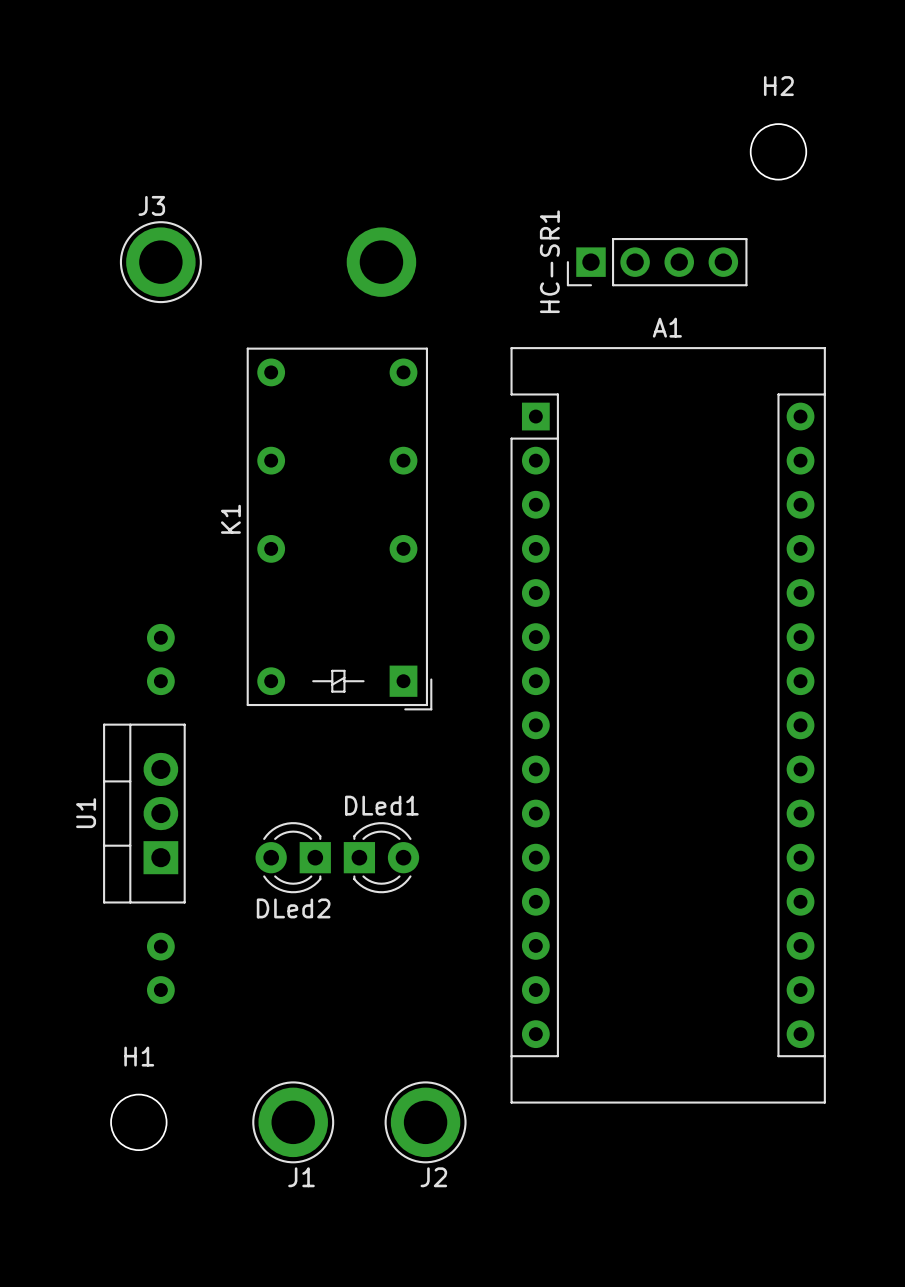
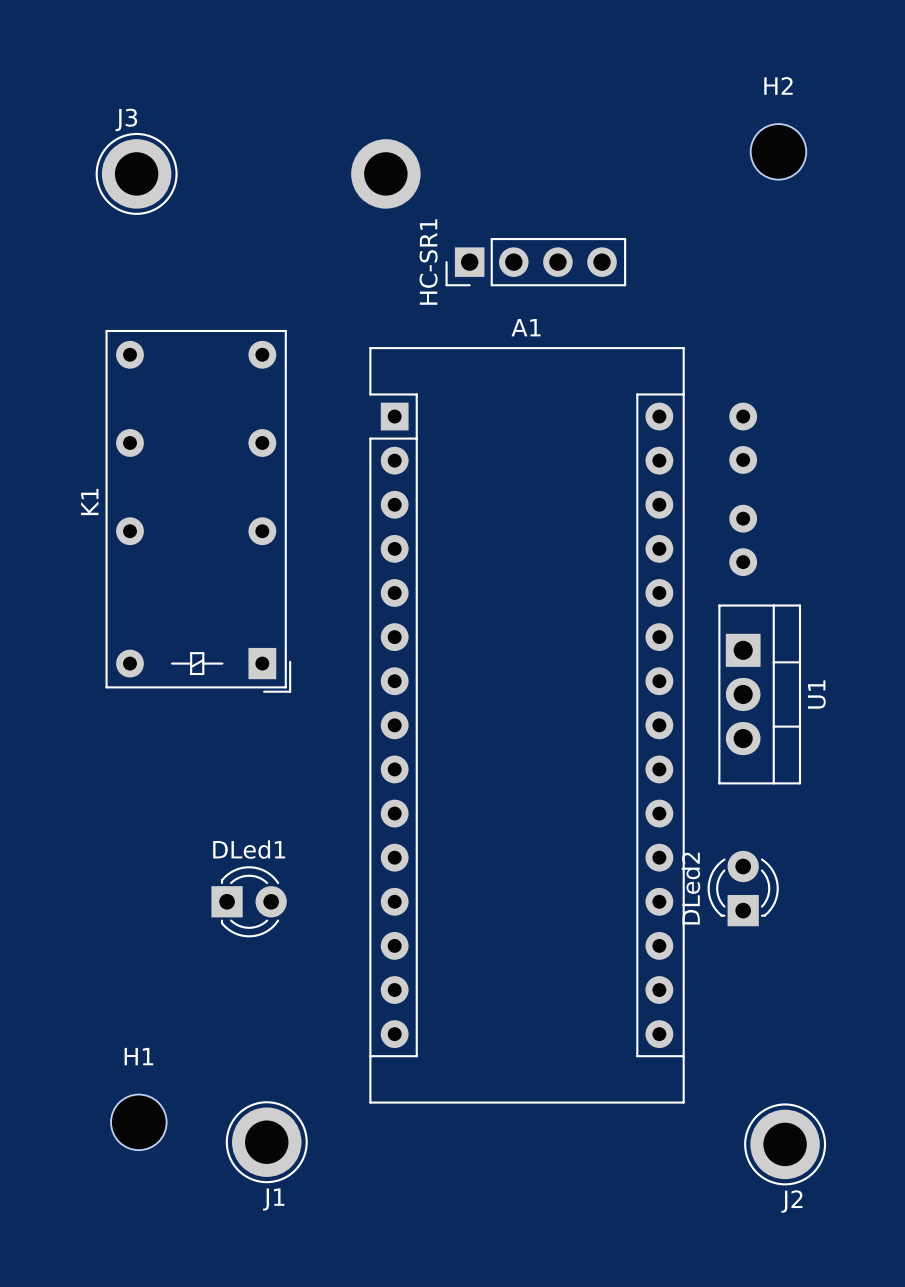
J3 position: (160, 262) -> (136, 173)
part position: (381, 262) -> (385, 173)
HC-SR1 position: (657, 262) -> (535, 262)
part: none -> (743, 438)
K1 position: (339, 528) -> (198, 511)
part: none -> (743, 540)
part: (160, 659) -> none
A1 position: (668, 725) -> (527, 725)
U1 rotation: 0° (144, 813) -> 180° (759, 694)
U1 position: (144, 813) -> (759, 694)
DLed2 rotation: 0° (293, 857) -> 90° clockwise (743, 888)
DLed2 position: (293, 857) -> (743, 888)
DLed1 position: (381, 857) -> (249, 901)
part: (160, 968) -> none
J1 position: (293, 1122) -> (266, 1142)
J2 position: (425, 1122) -> (785, 1144)

